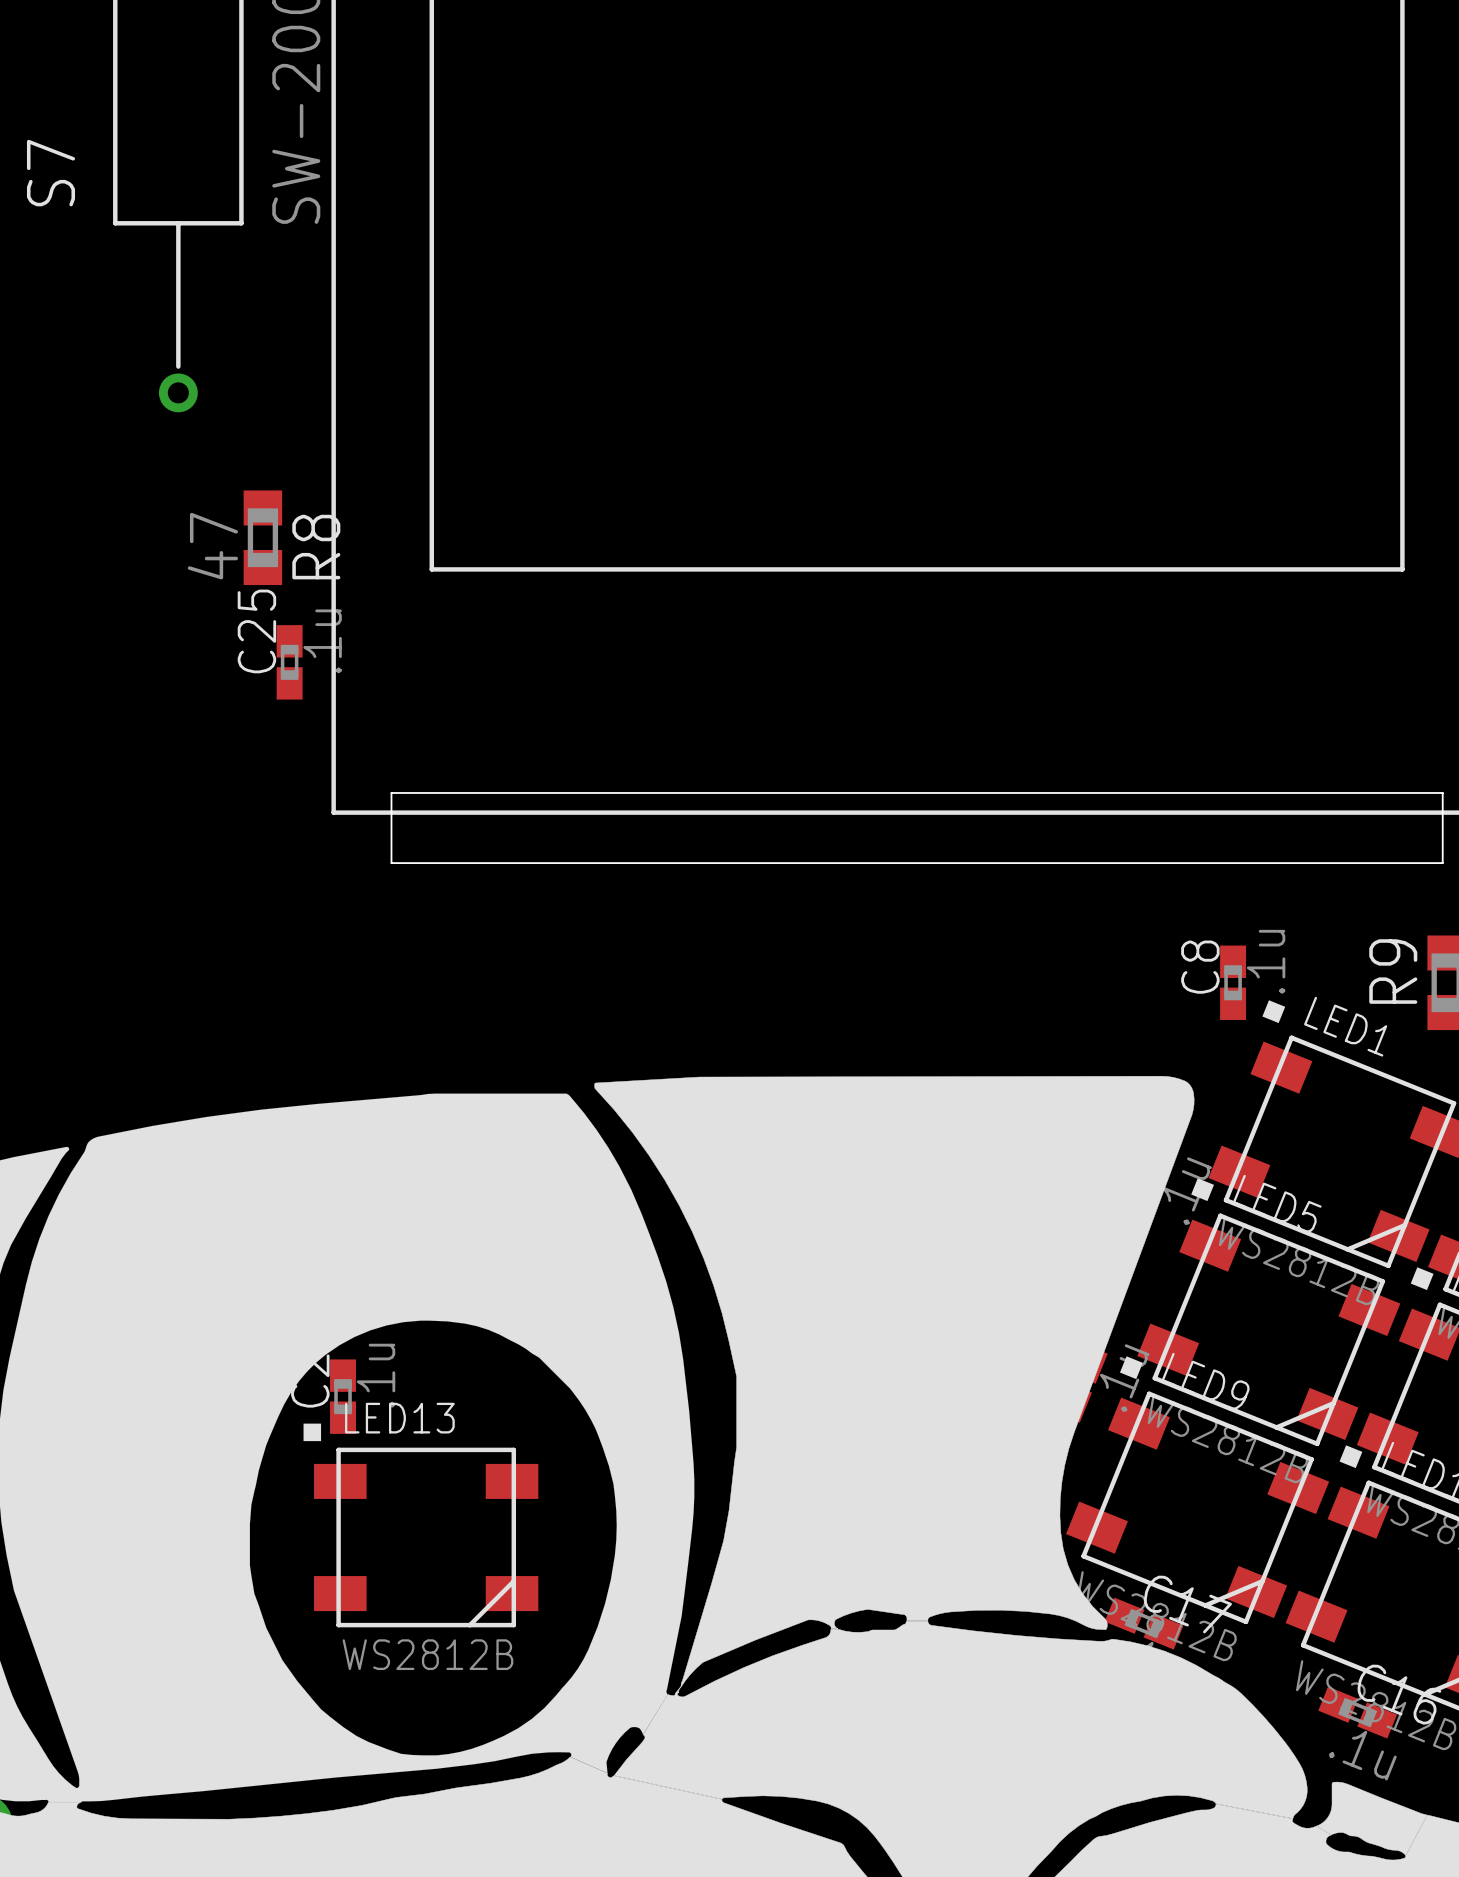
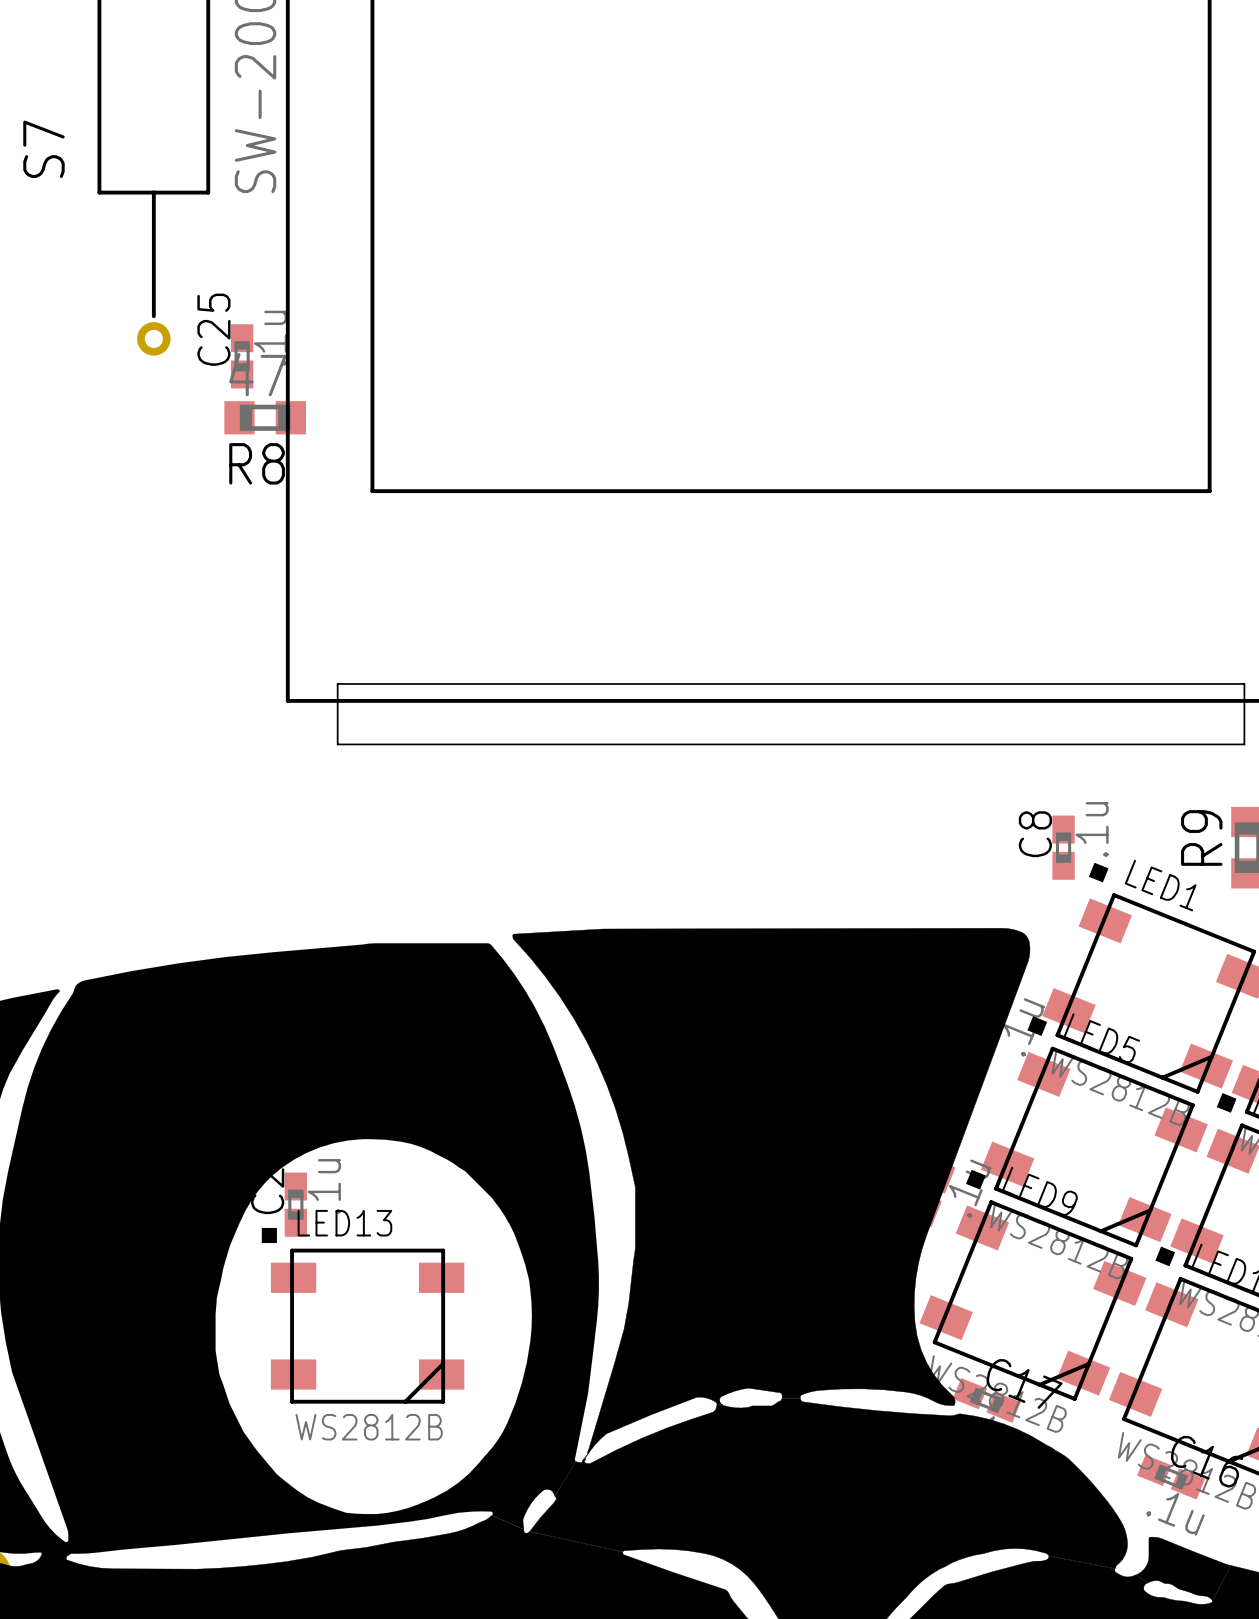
R8 rotation: 0° (262, 537) -> 90° clockwise (265, 417)
R8 position: (262, 537) -> (265, 417)
C25 position: (289, 662) -> (242, 356)

